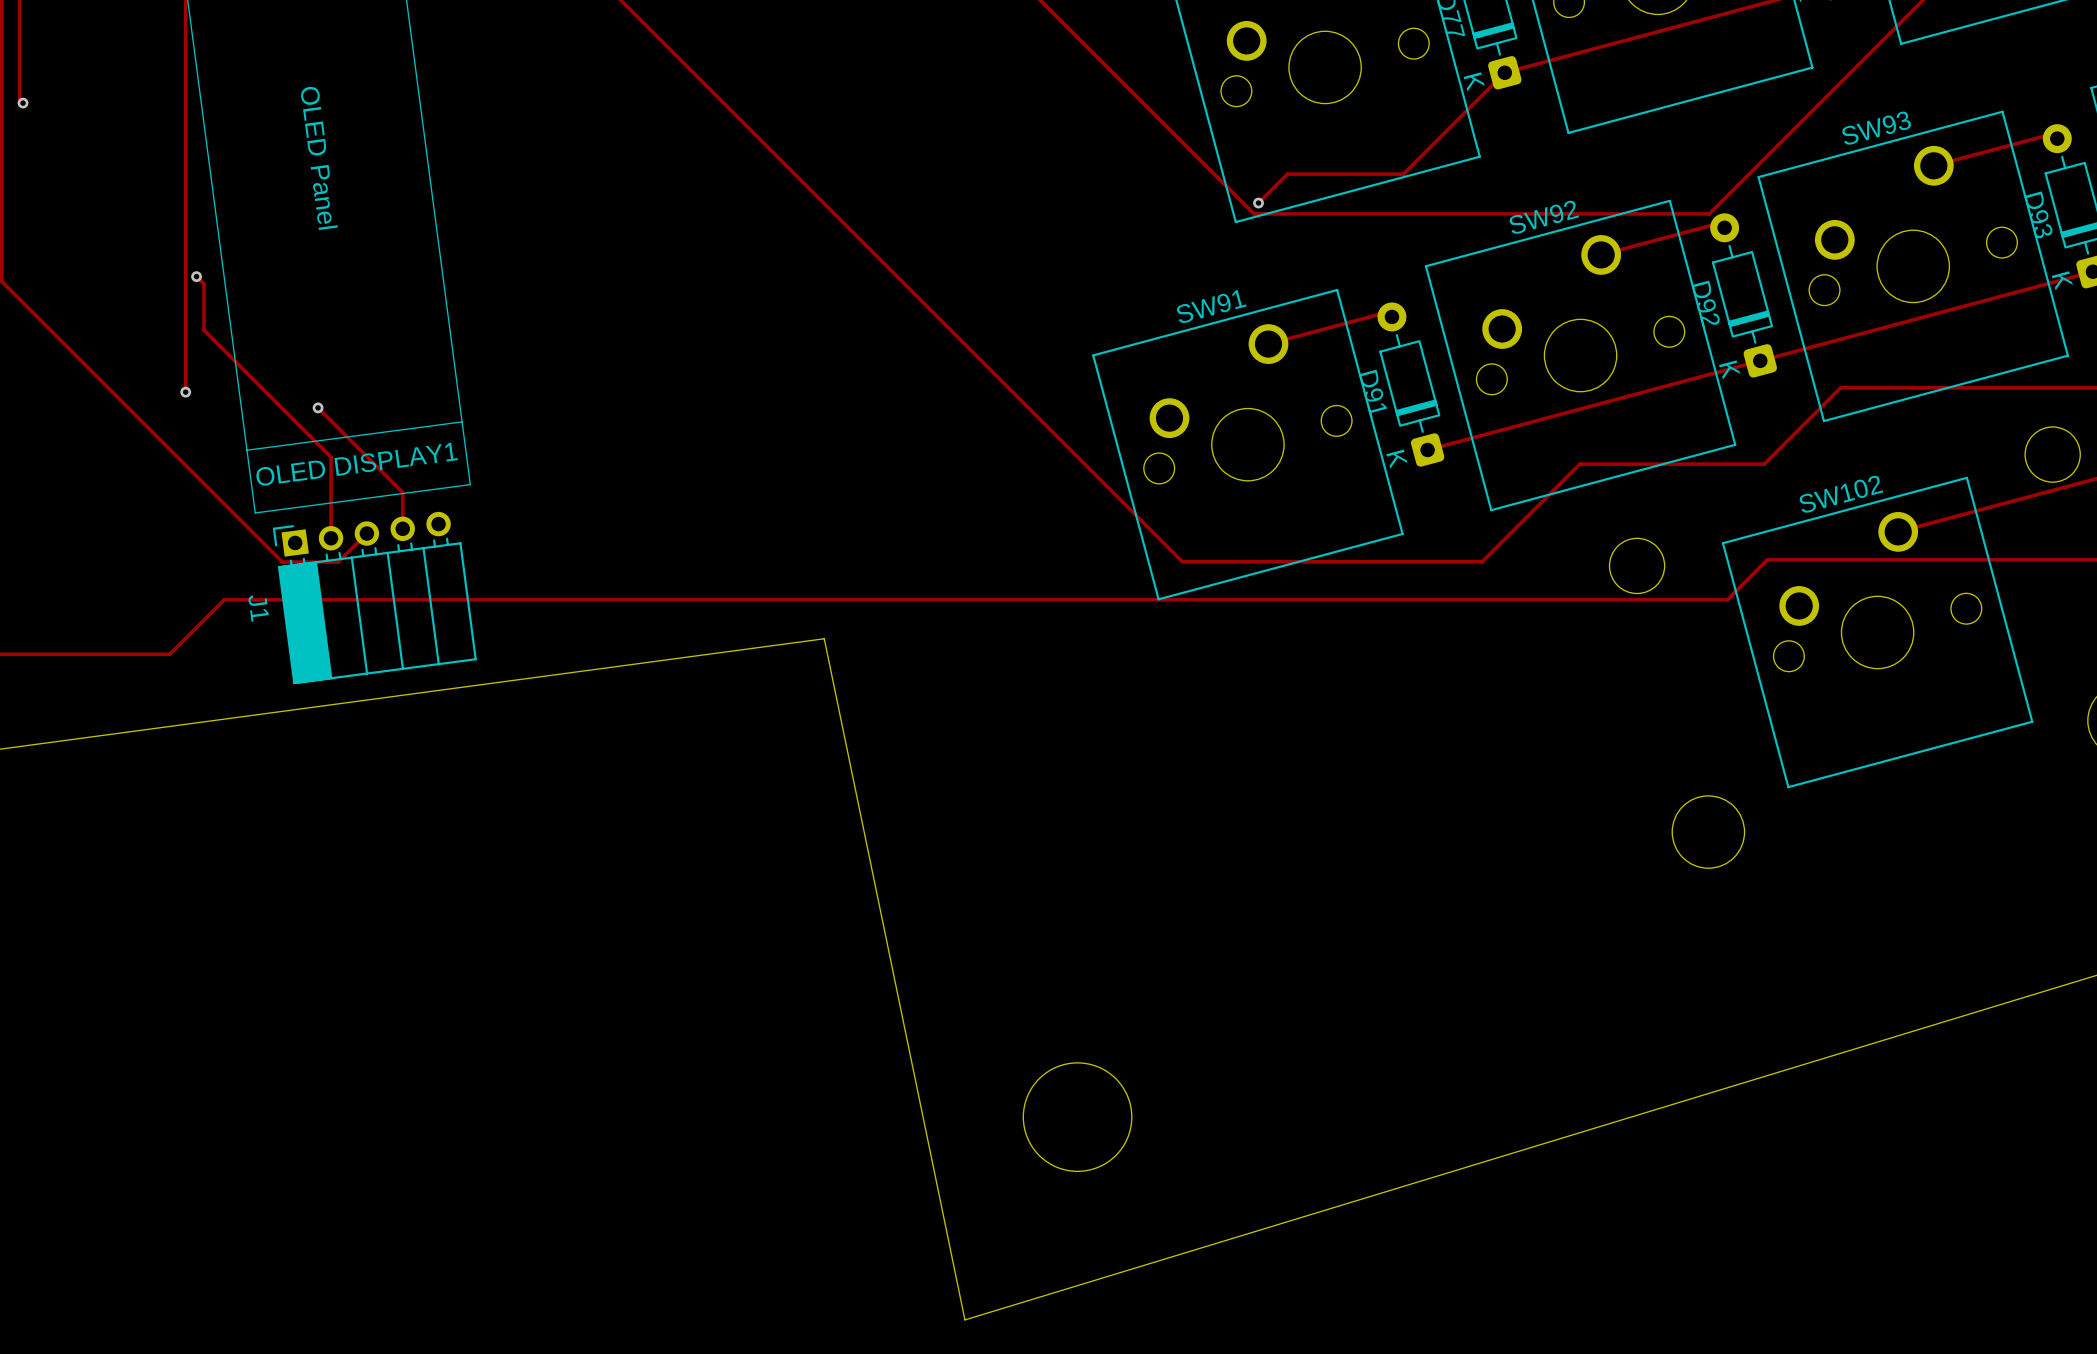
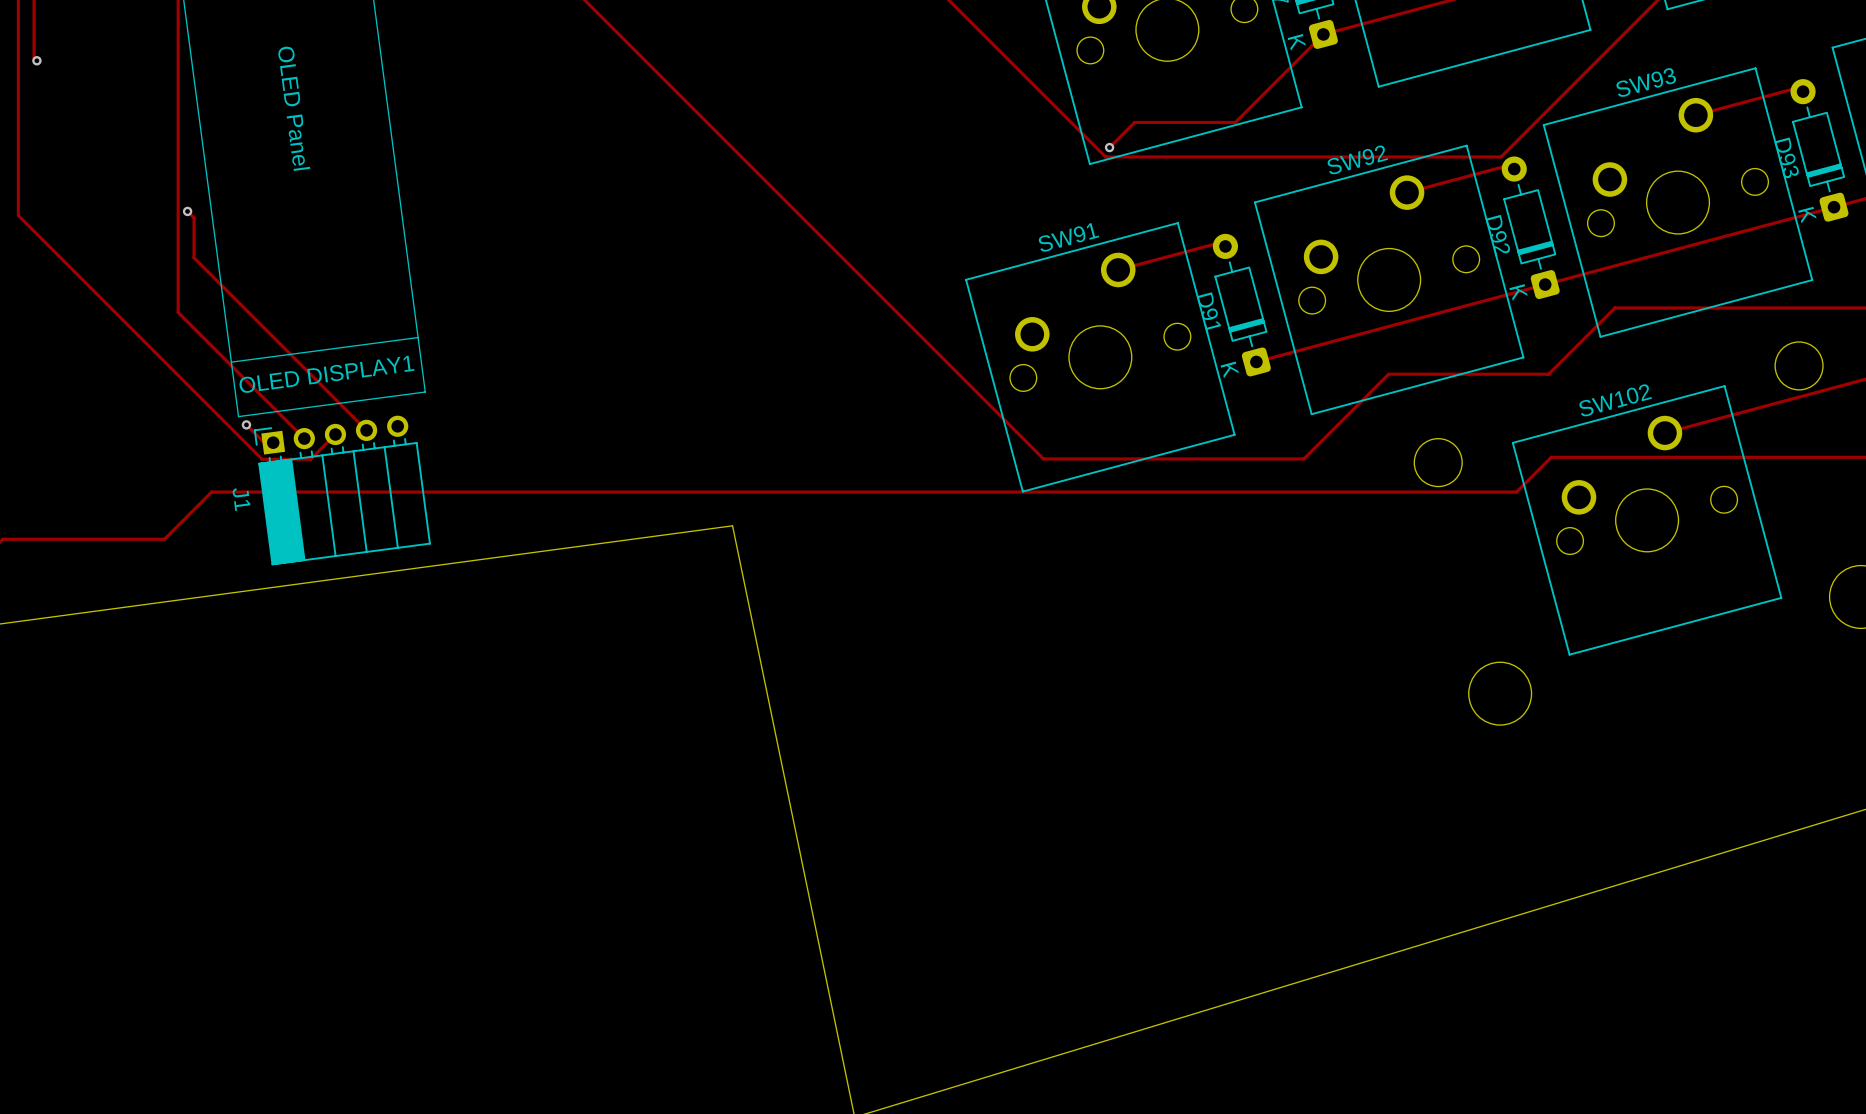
via: (185, 392) -> none
track: (318, 407) (402, 492) (402, 528) -> (304, 368) (366, 430)
via: (318, 407) -> none
track: (331, 457) (331, 538) -> (178, 312) (304, 438)
track: none -> (246, 424) (264, 442)
via: none -> (246, 424)
round board edge: [1022, 1062, 1133, 1172] -> none

